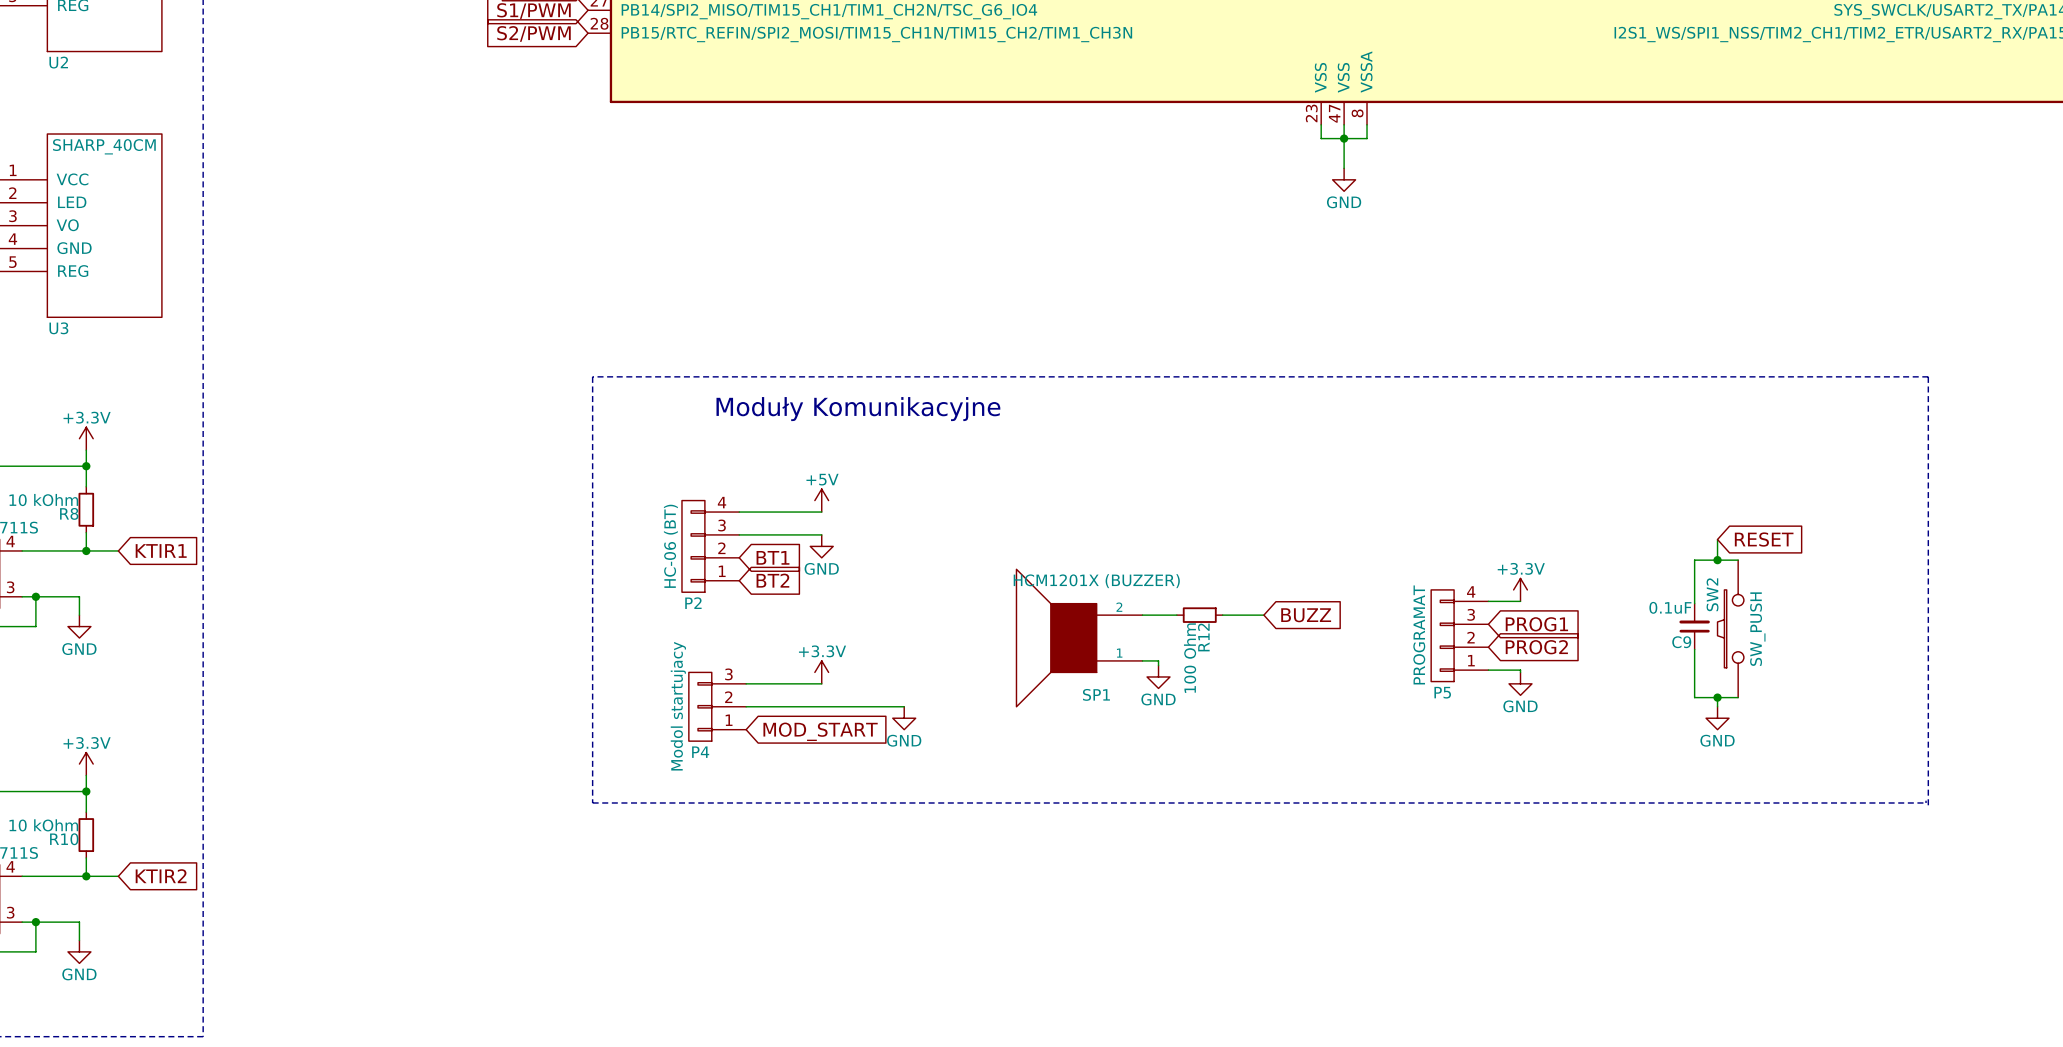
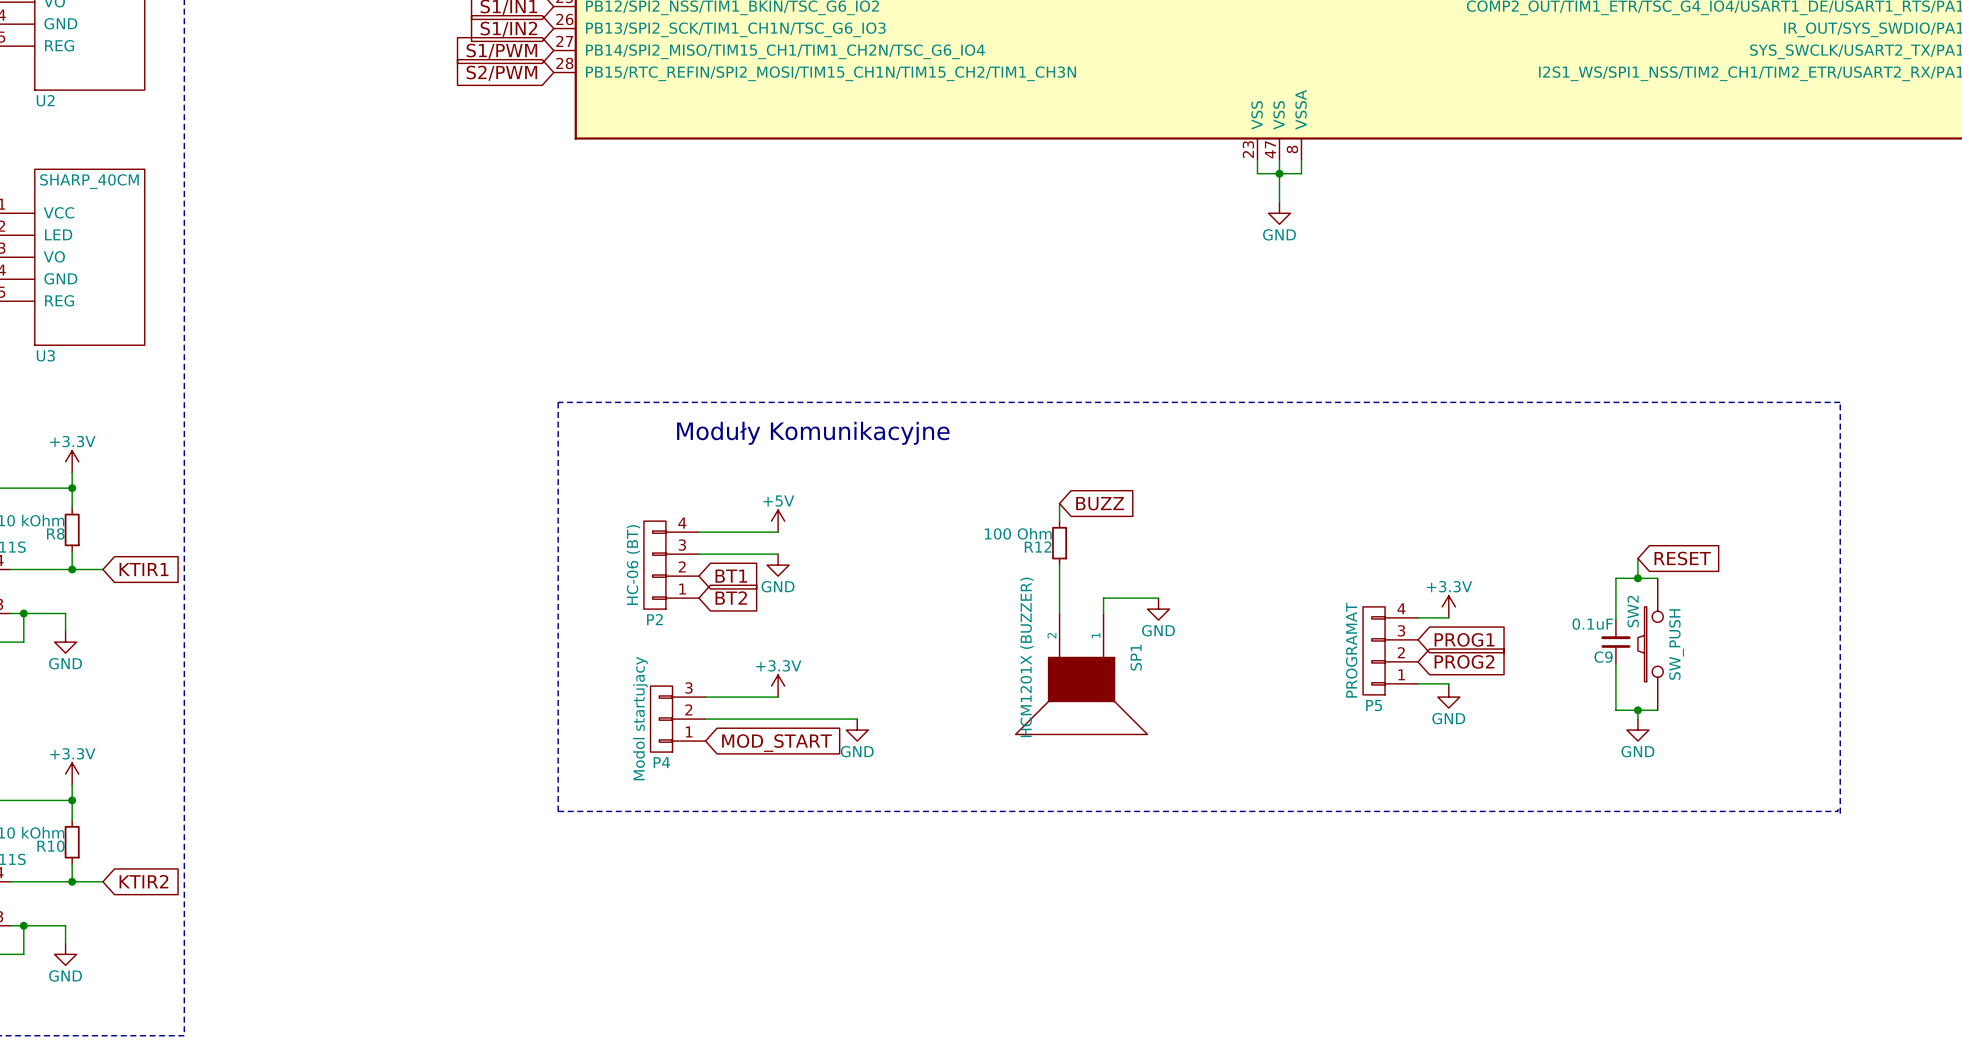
wire: none -> (1059, 503) (1059, 521)
wire: none -> (1059, 565) (1059, 613)
wire: none -> (1158, 598) (1103, 598) (1103, 613)
wire: (1142, 615) (1176, 615) -> none
R12 rotation: 0° (1199, 615) -> 90° clockwise (1059, 543)
R12 position: (1199, 615) -> (1059, 543)
wire: (1222, 615) (1263, 615) -> none
global label position: BUZZ (1306, 615) -> BUZZ (1100, 503)
SP1 rotation: 0° (1056, 638) -> 90° counterclockwise (1081, 695)
power symbol position: GND (1158, 676) -> GND (1158, 609)

